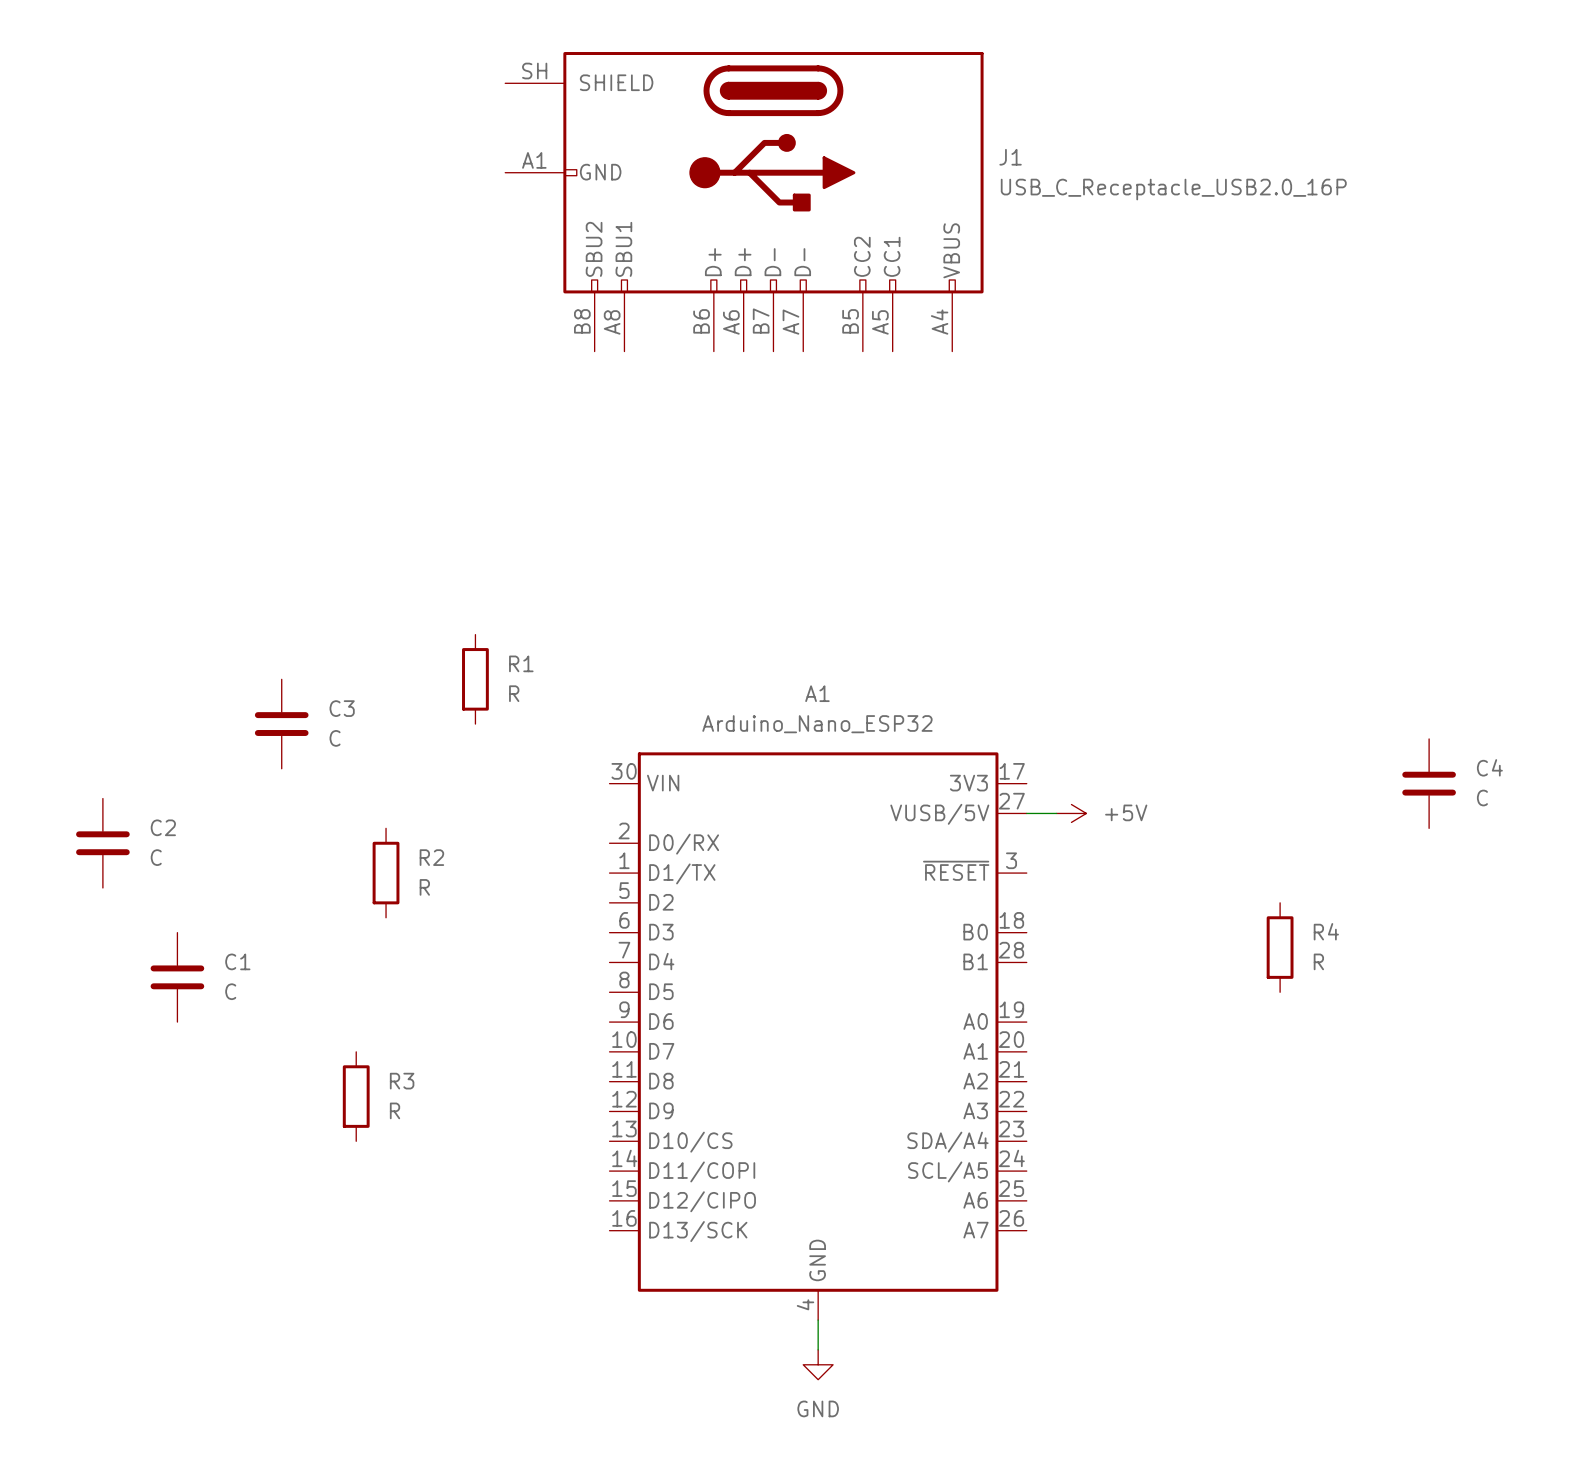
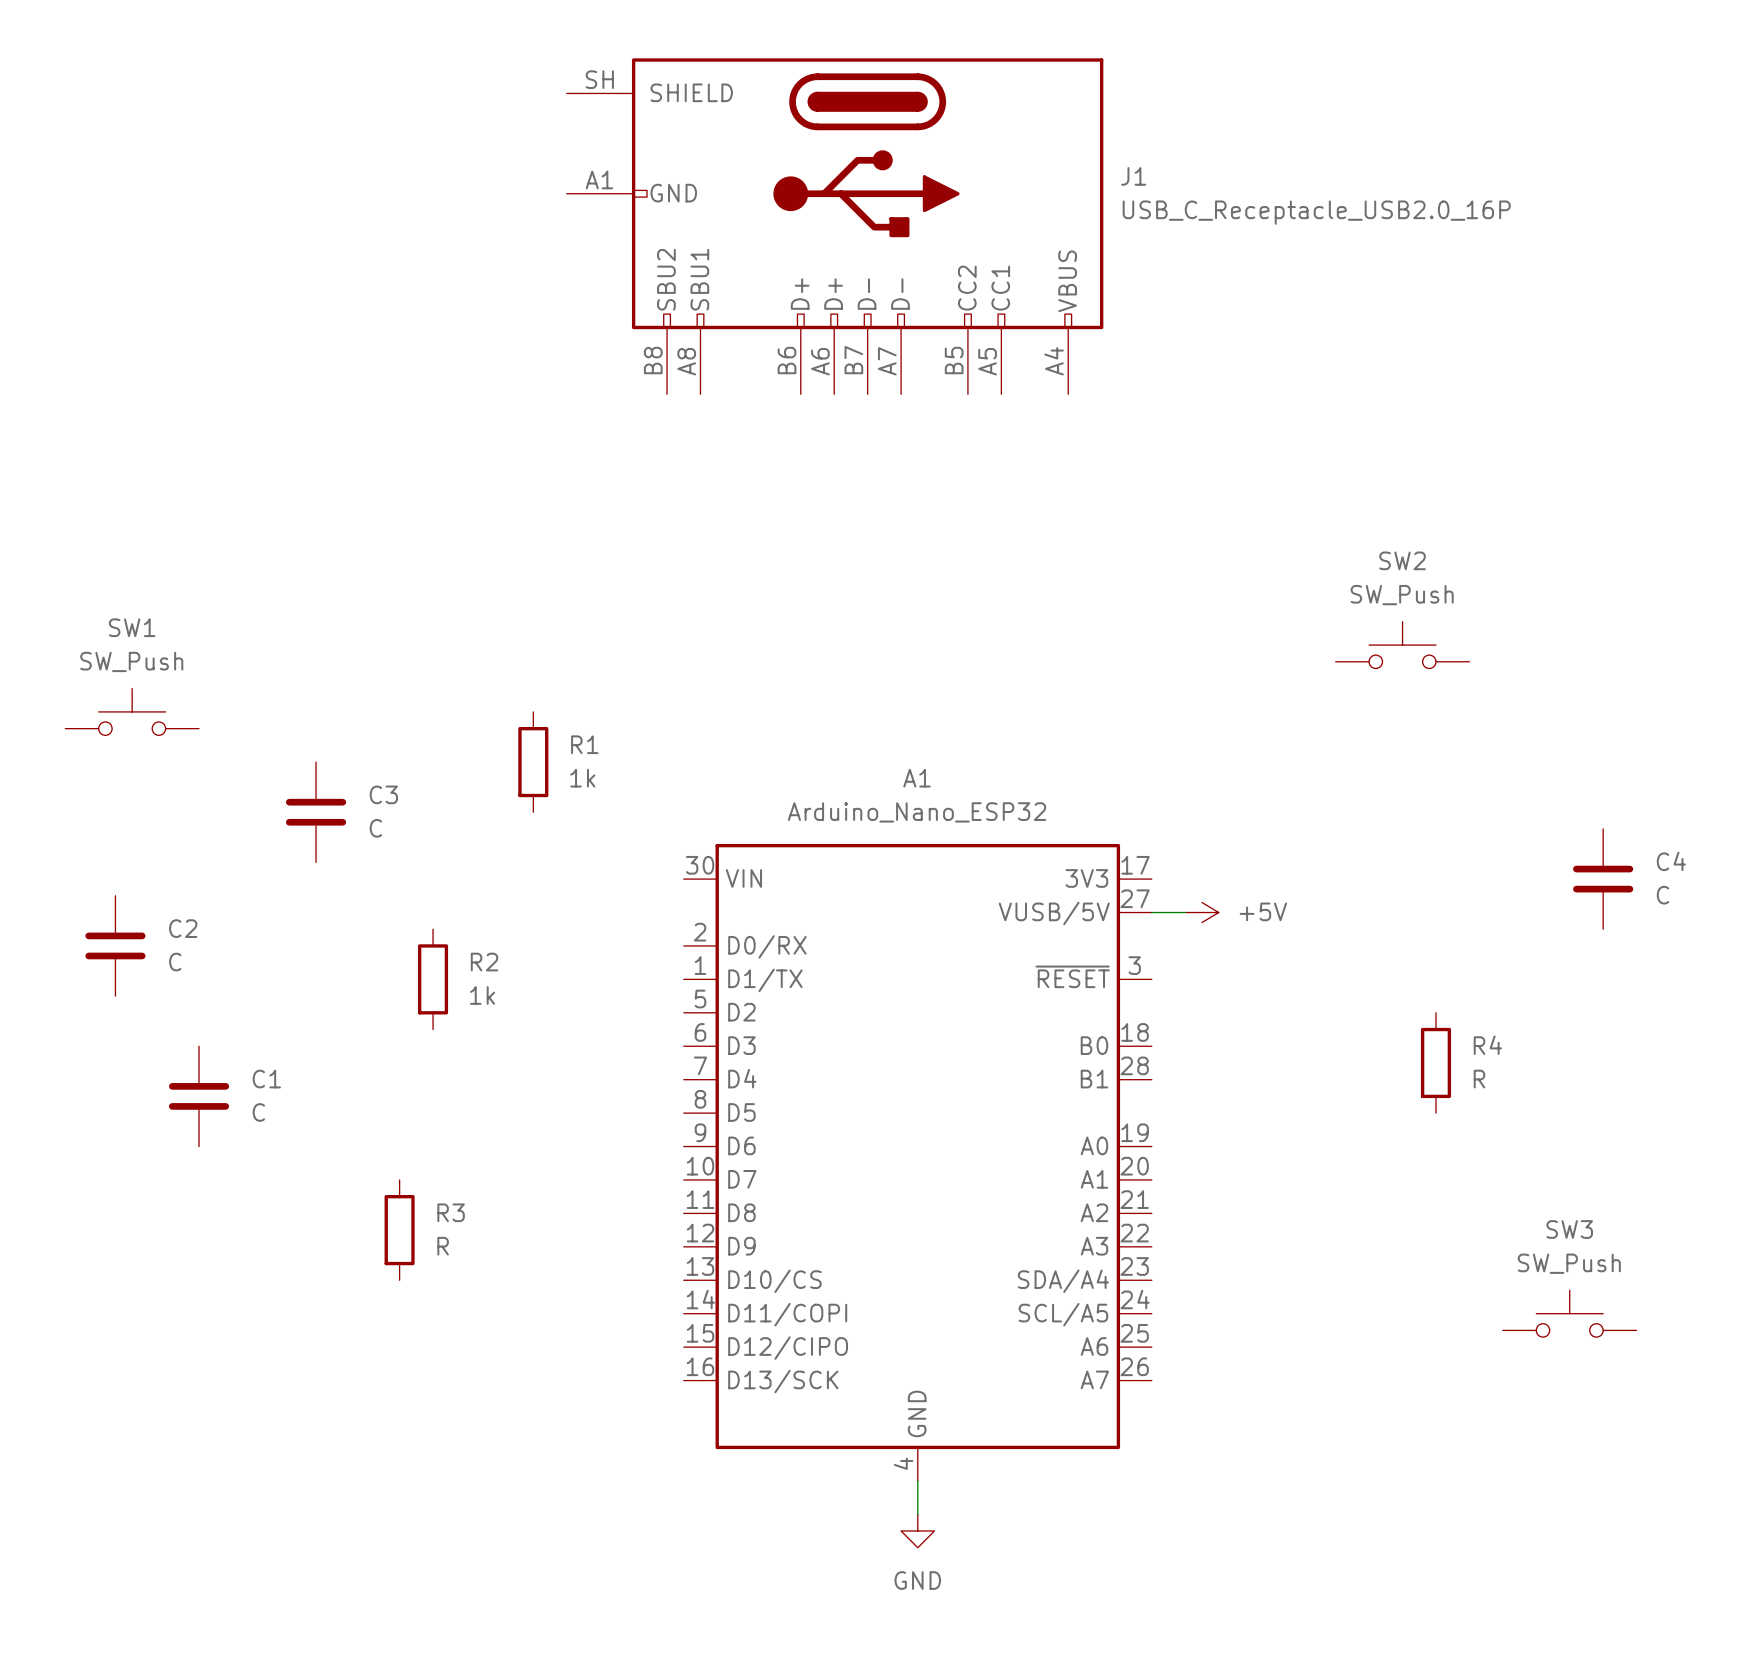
SW2: none -> SW_Push (1402, 645)
SW1: none -> SW_Push (132, 711)
R1 value: R (514, 693) -> 1k (582, 778)
R2 value: R (424, 887) -> 1k (482, 995)
SW3: none -> SW_Push (1569, 1313)

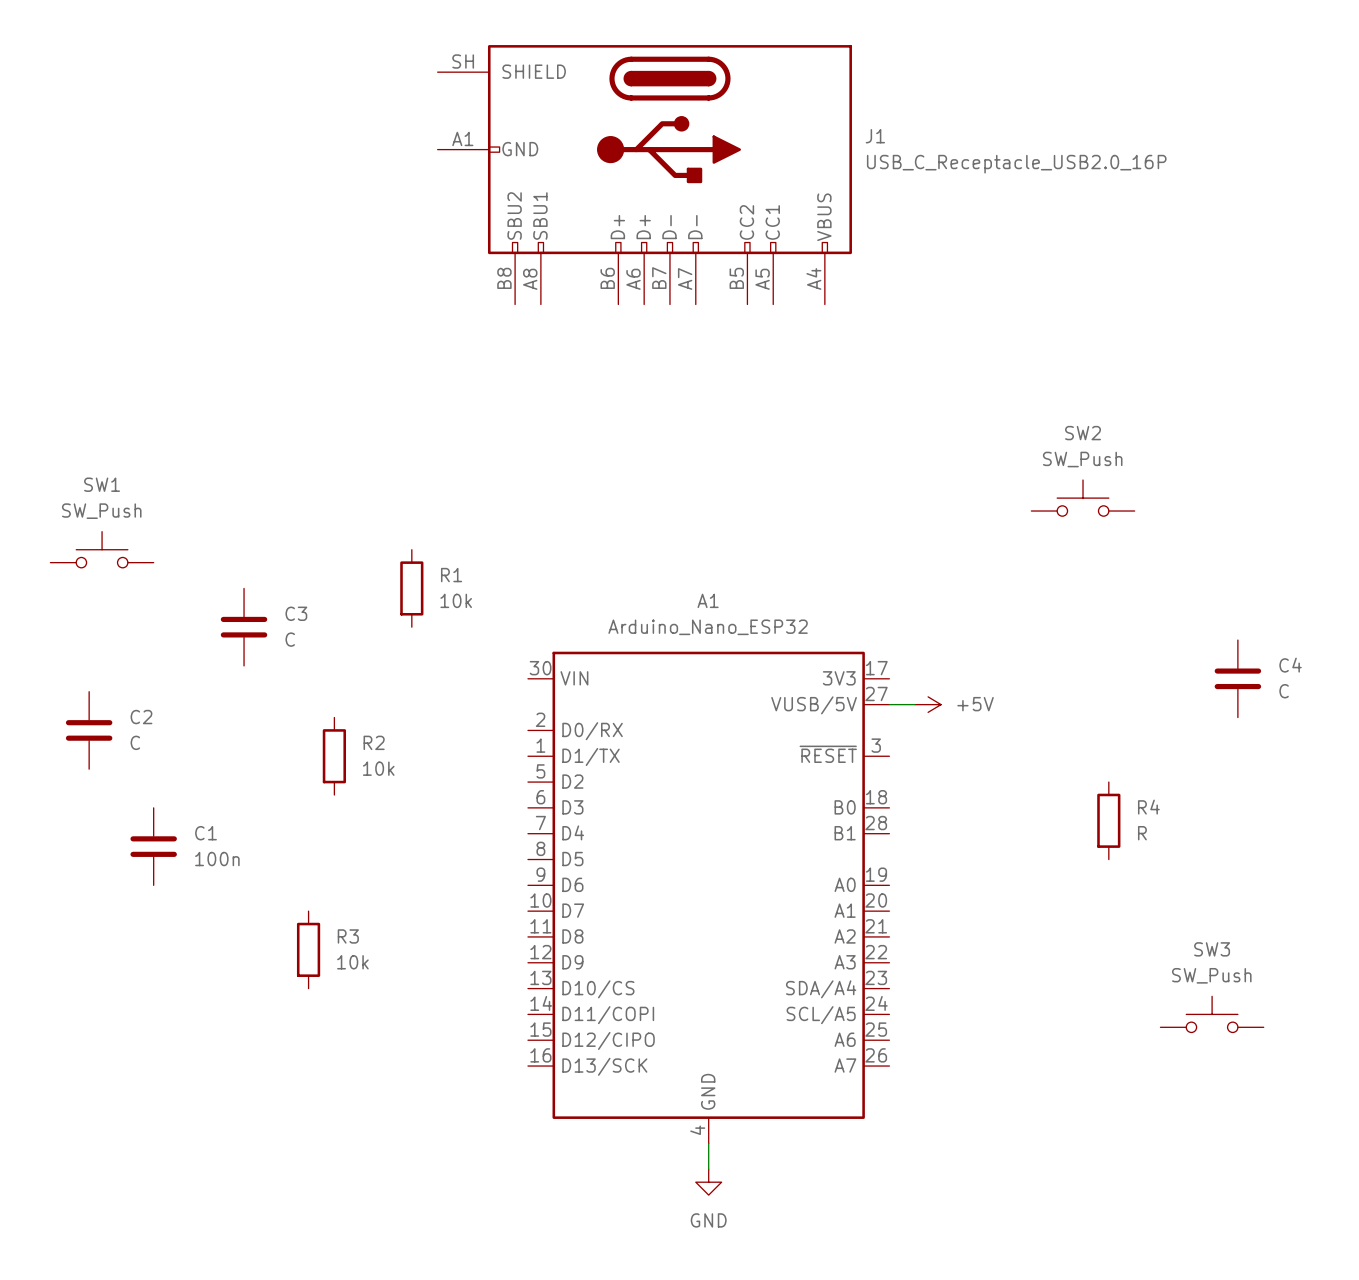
R1 value: 1k (582, 778) -> 10k (456, 600)
R2 value: 1k (482, 995) -> 10k (378, 768)
C1 value: C (258, 1112) -> 100n (217, 859)
R3 value: R (443, 1246) -> 10k (352, 962)

